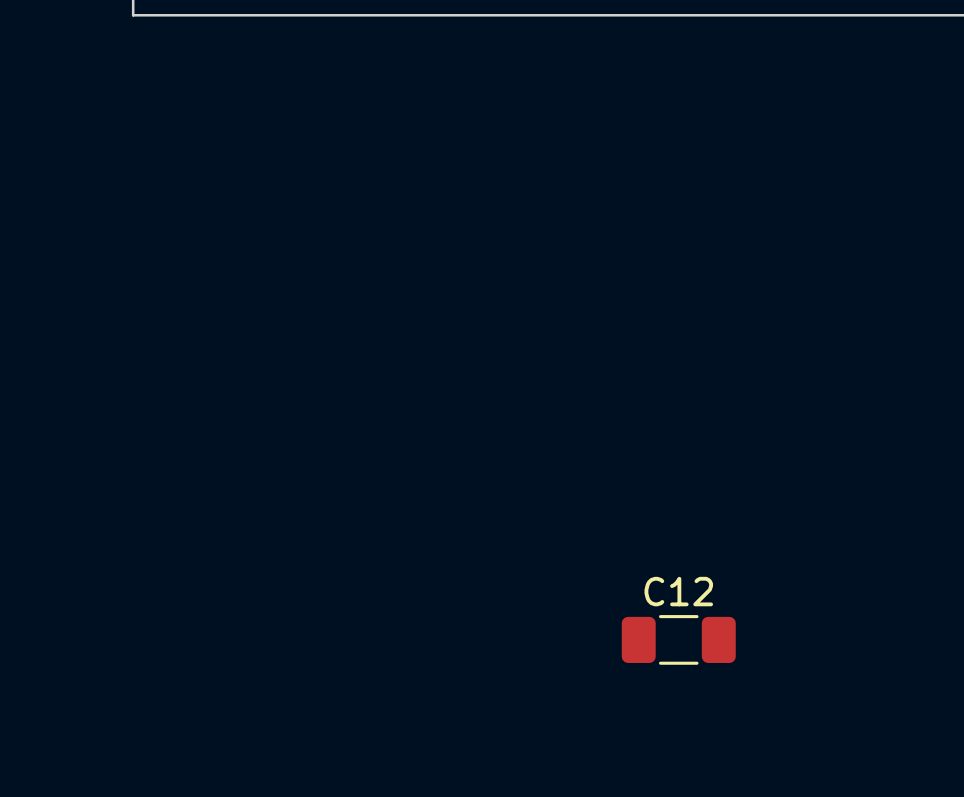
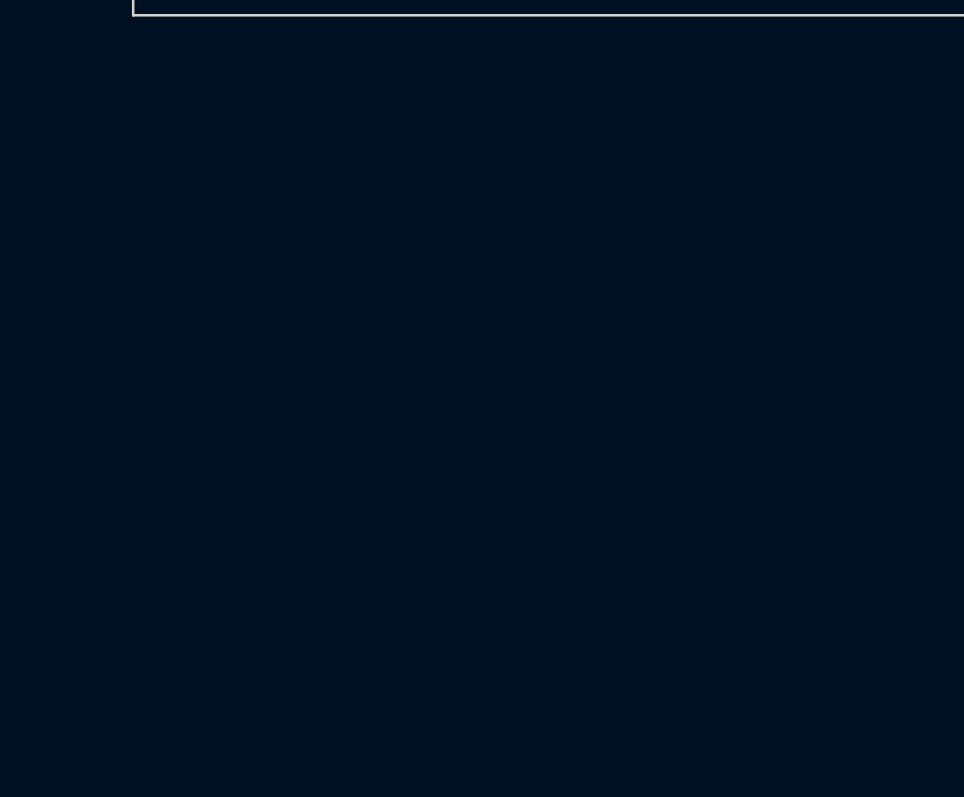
C12: (678, 639) -> none

